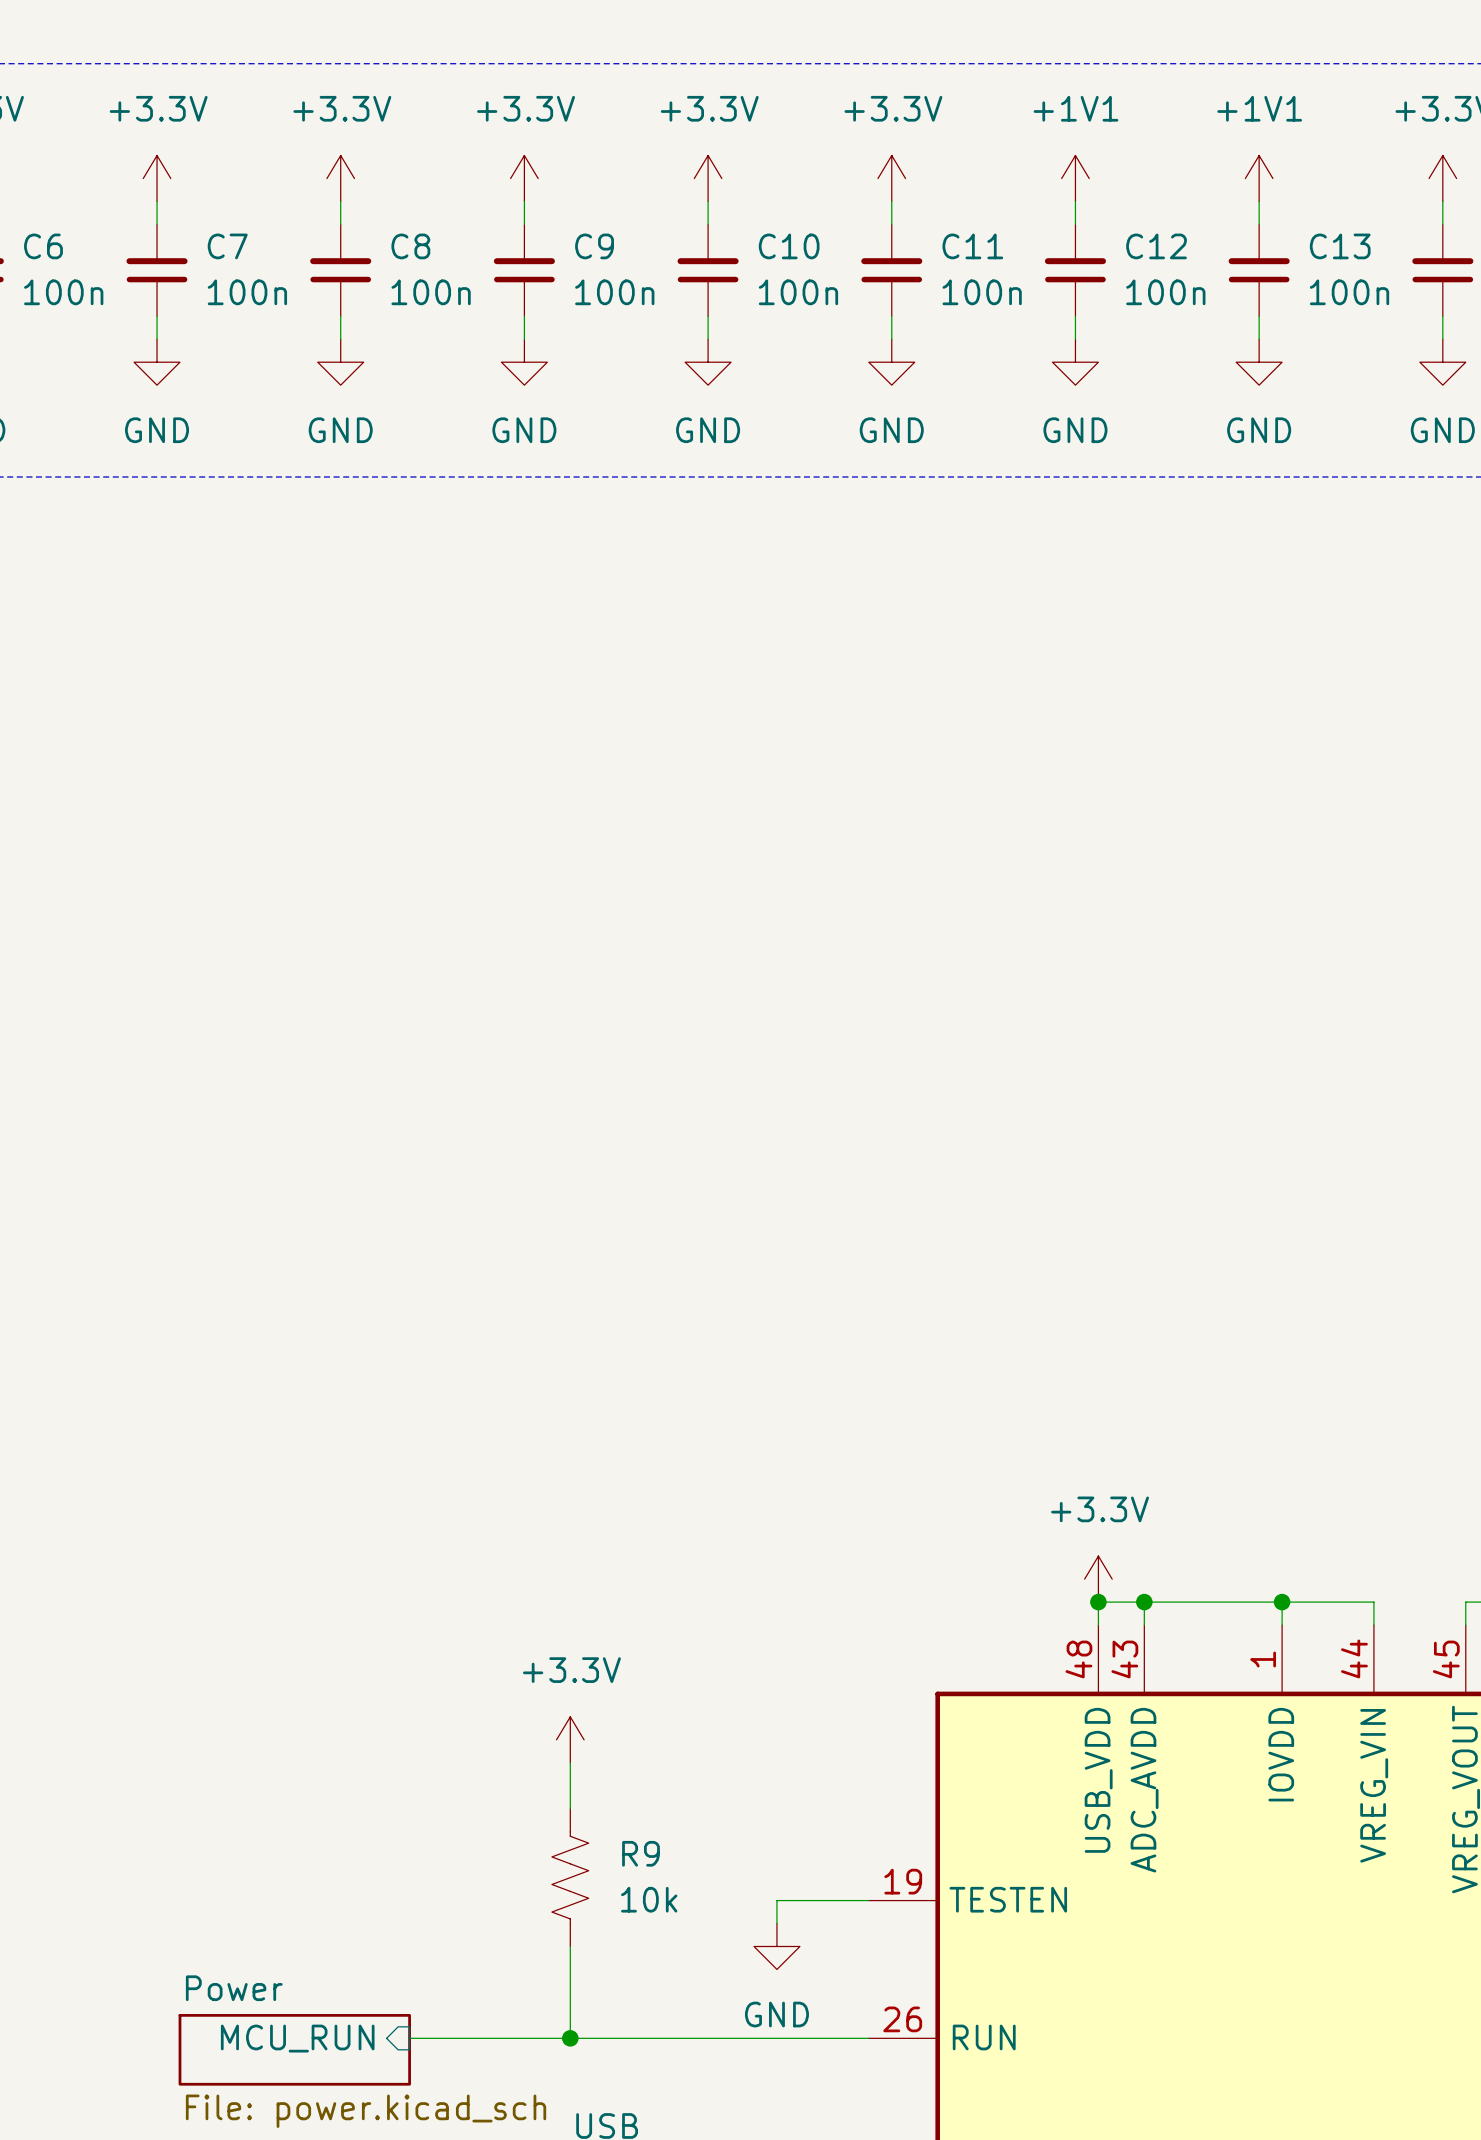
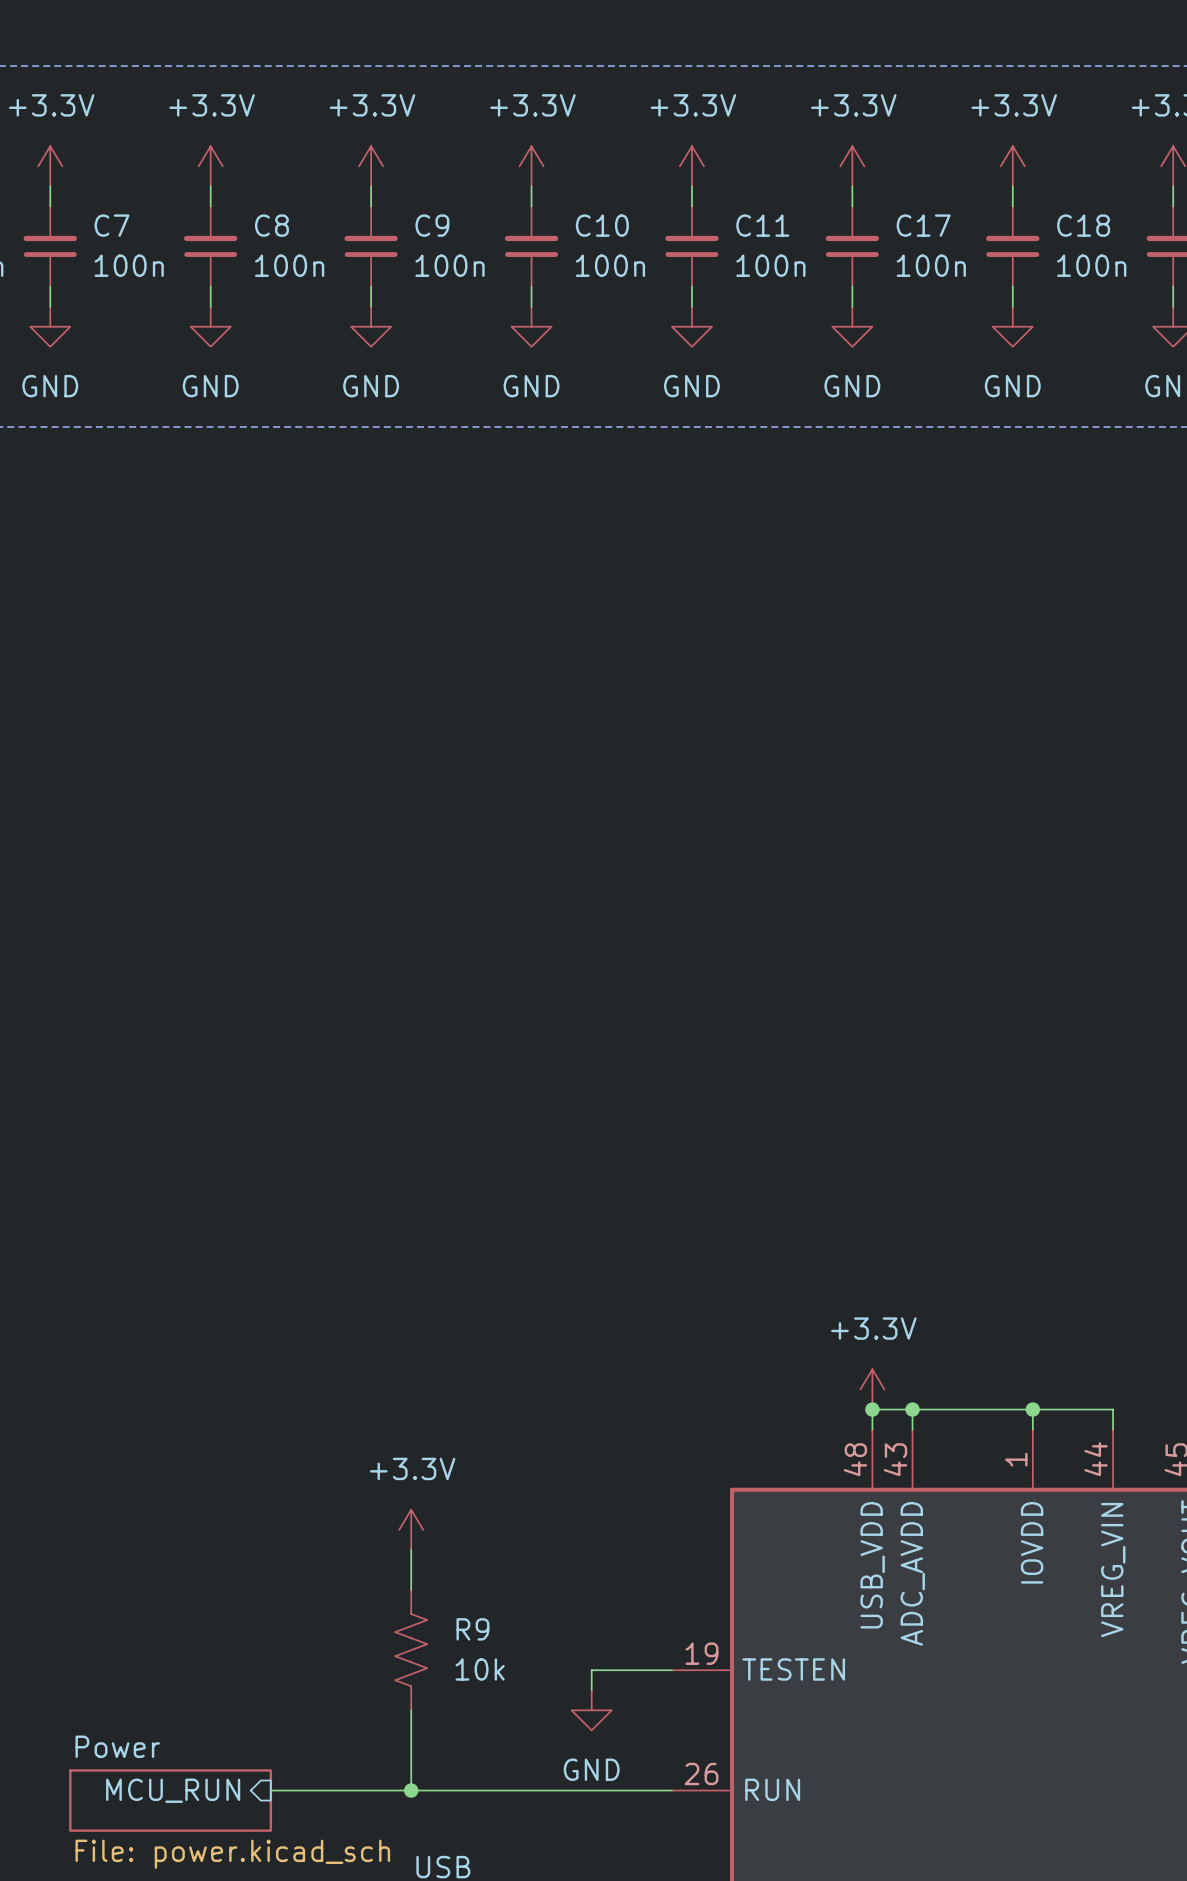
power symbol: +1V1 (1075, 178) -> +3.3V (852, 166)
power symbol: +1V1 (1259, 178) -> +3.3V (1012, 166)
C12 name: C12 (1156, 246) -> C17 (923, 225)
C13 name: C13 (1340, 246) -> C18 (1083, 225)

